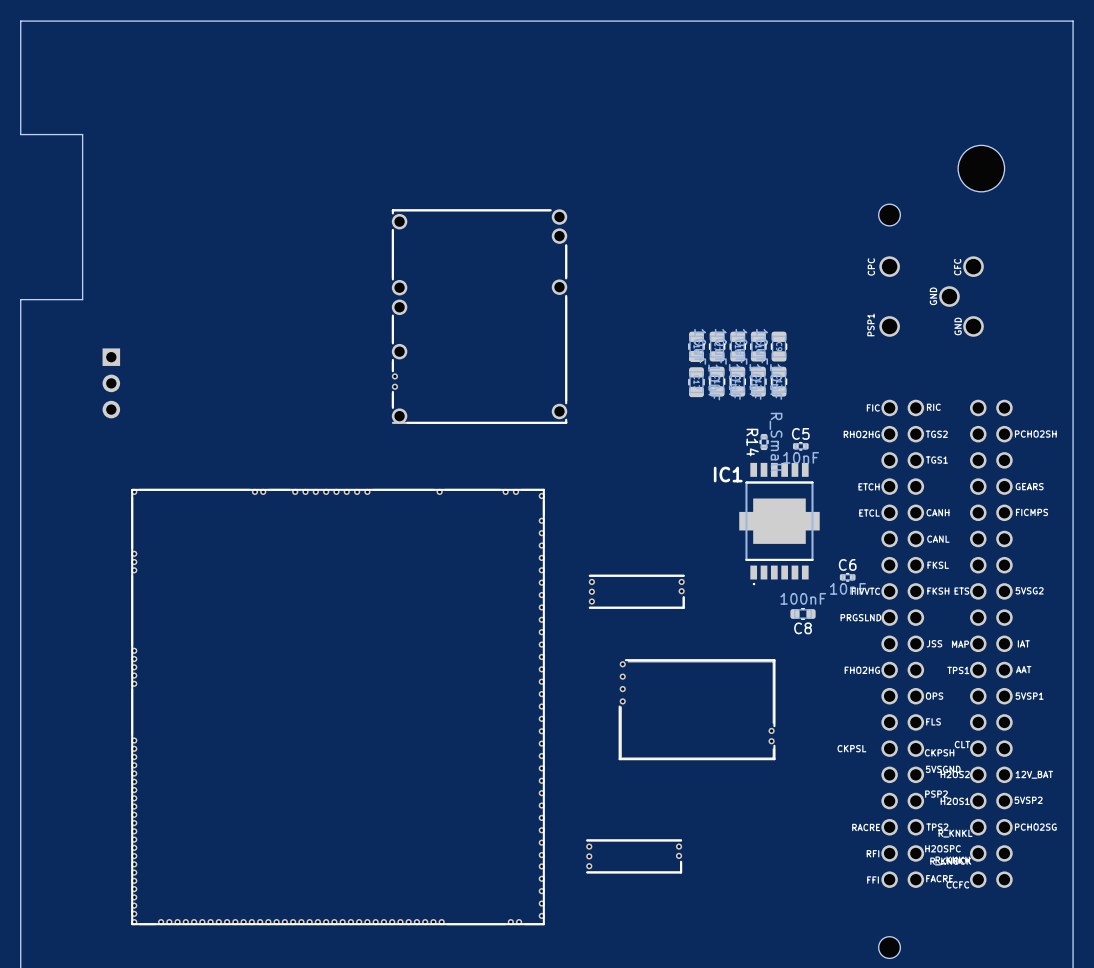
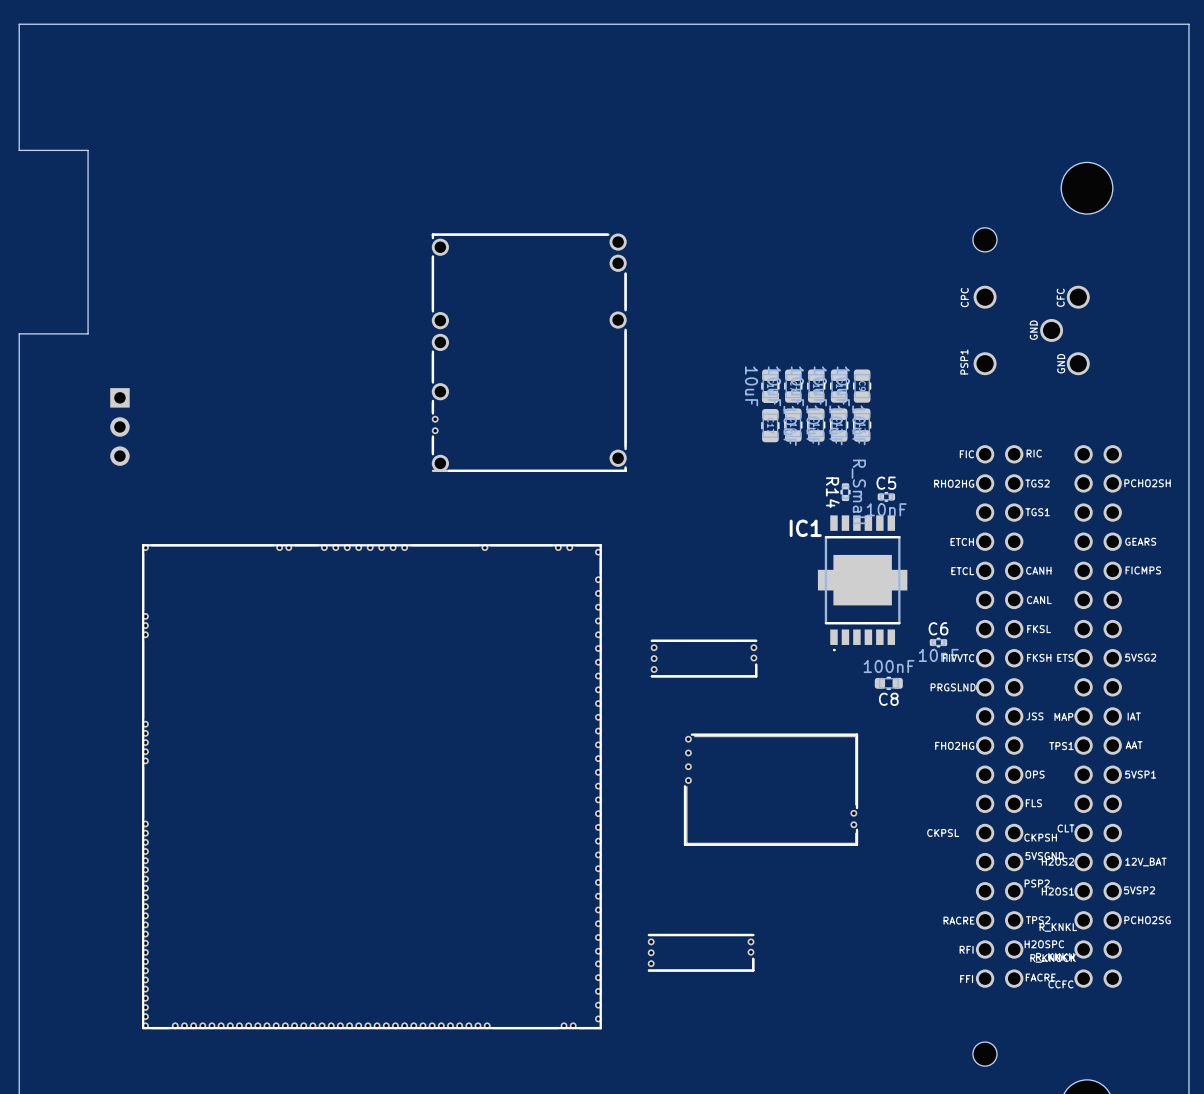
part value: none -> 10uF (751, 386)

